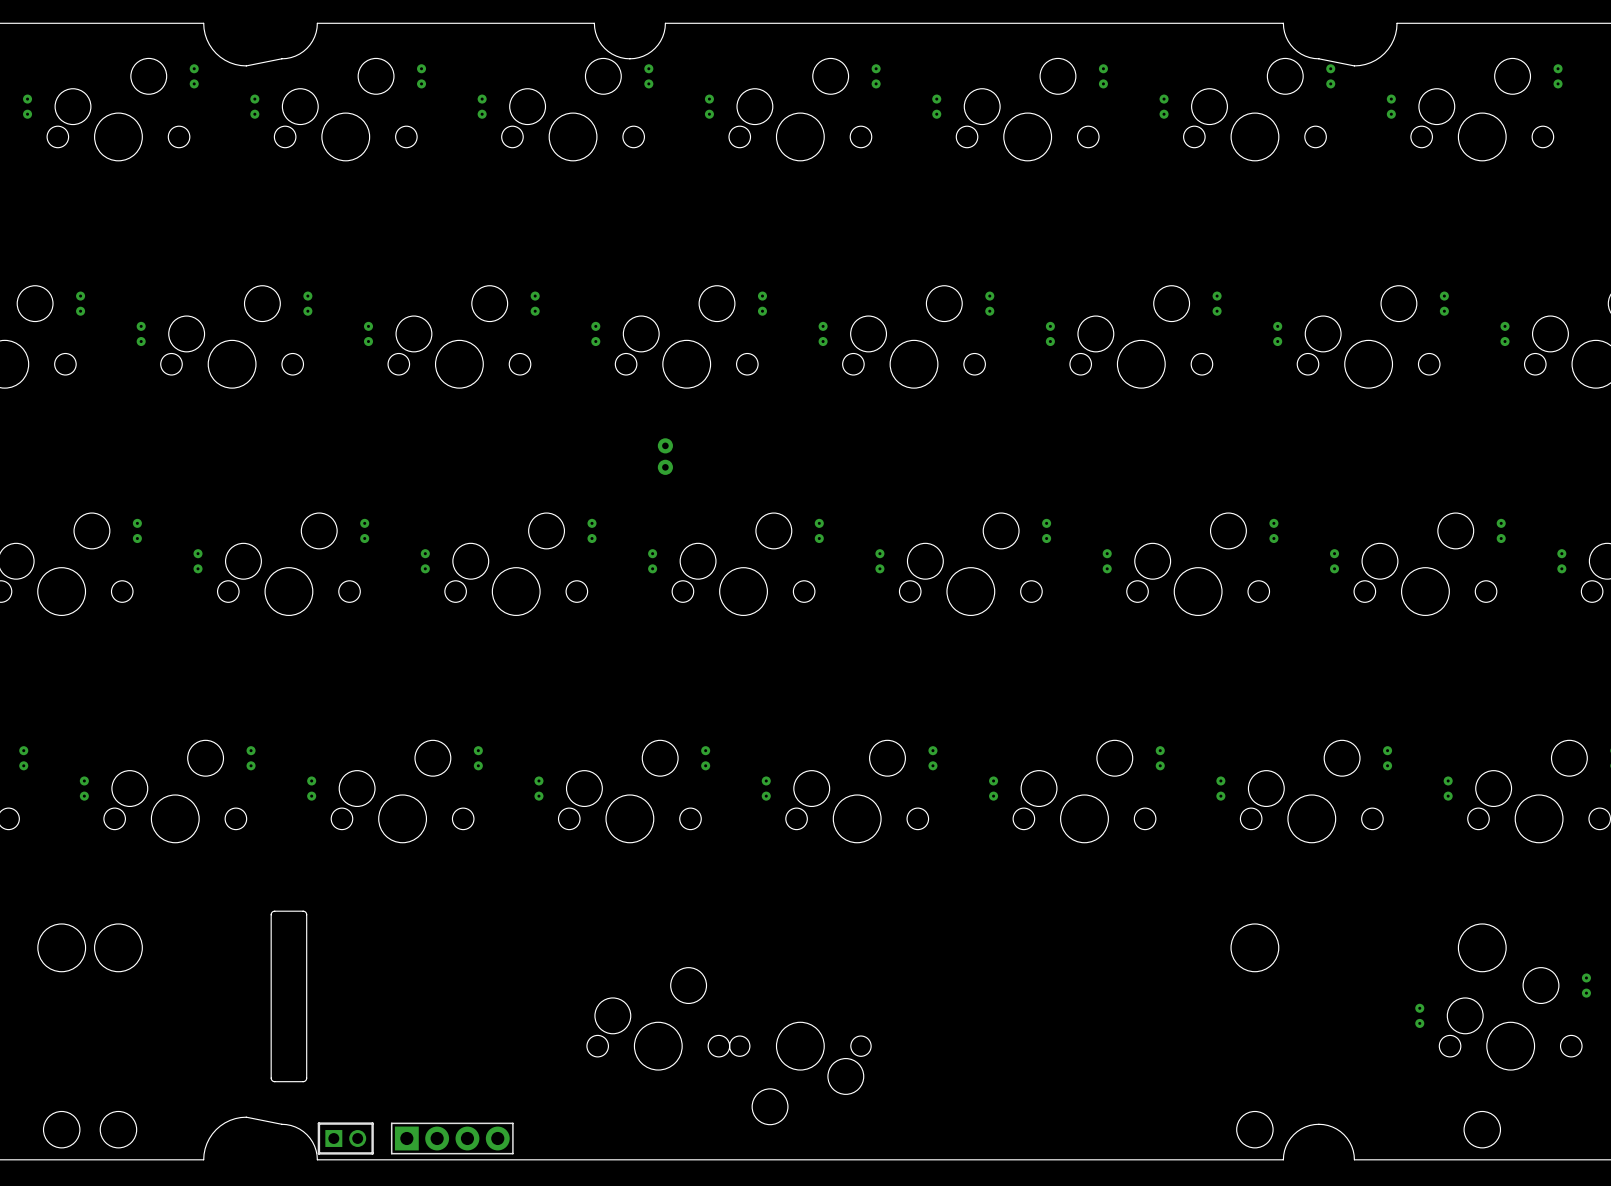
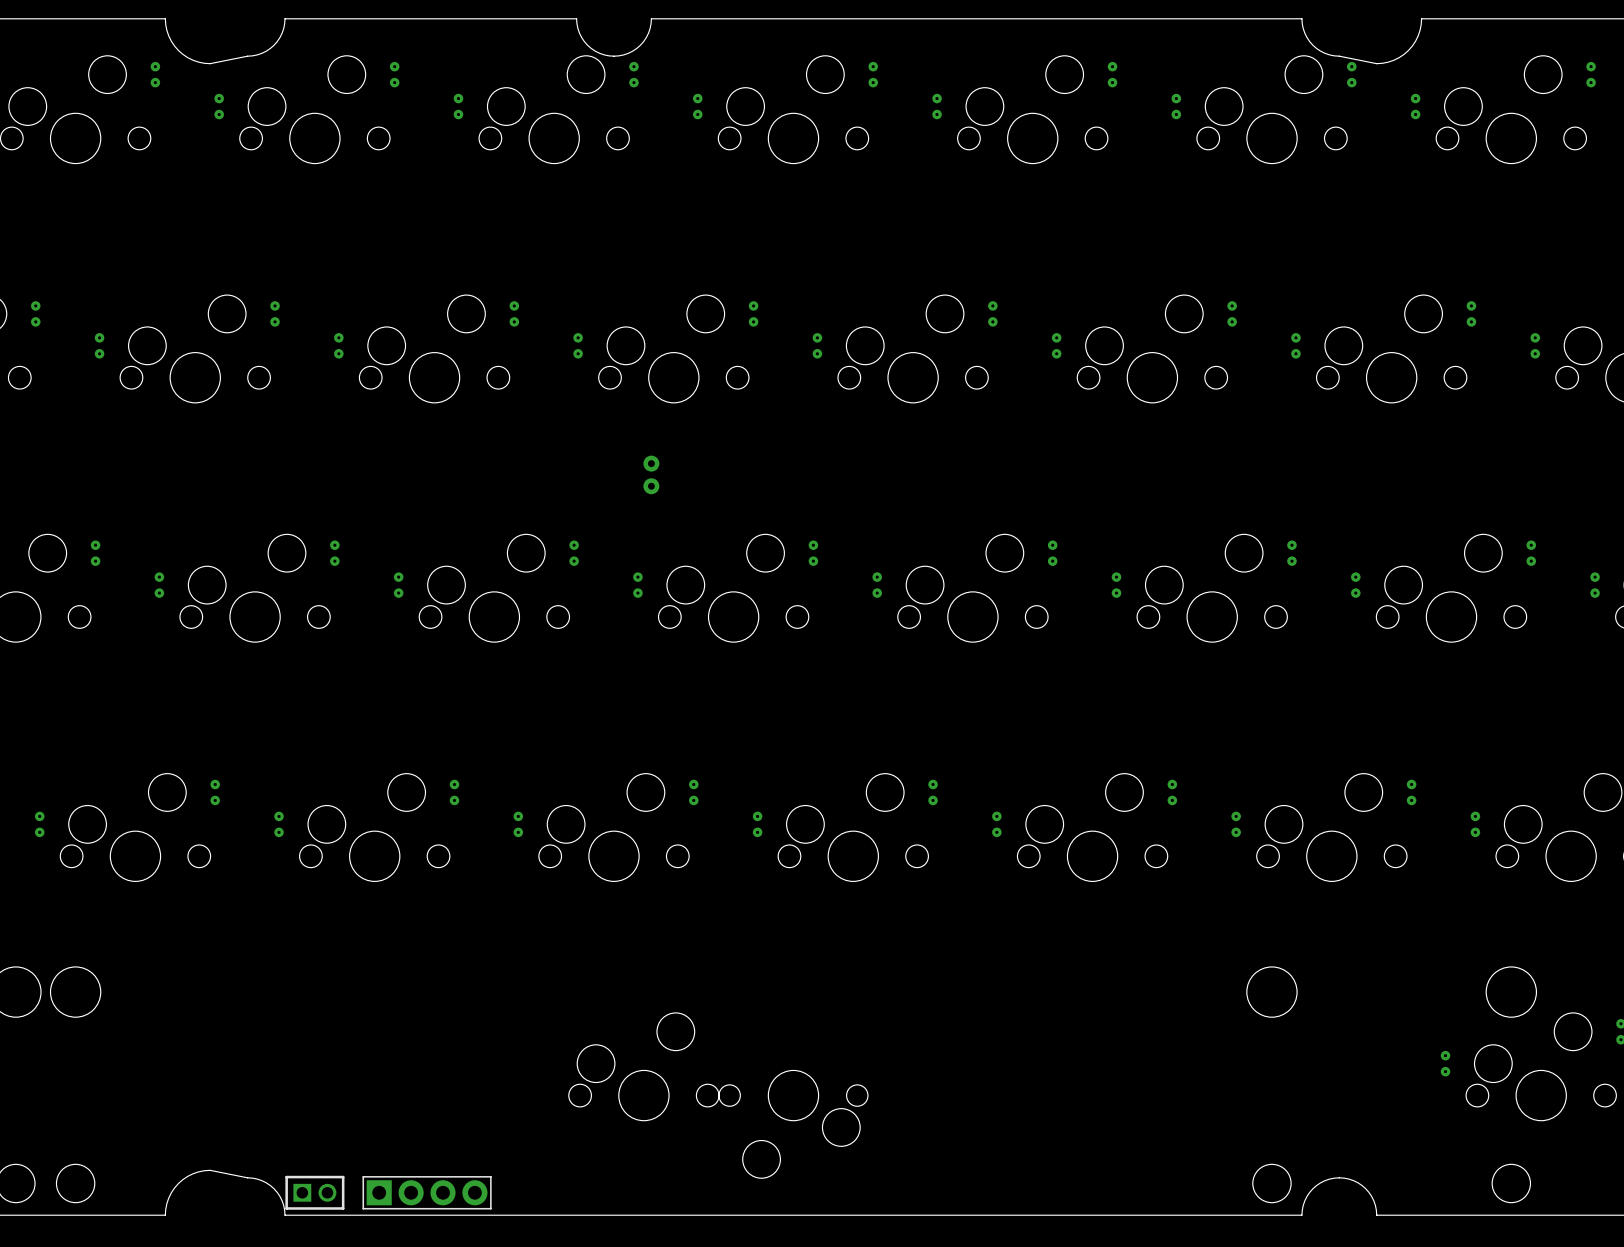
board edge: (274, 911) (303, 911) (306, 914) (306, 1078) (303, 1081) (274, 1081) (271, 1078) (271, 914) (274, 911) -> none

